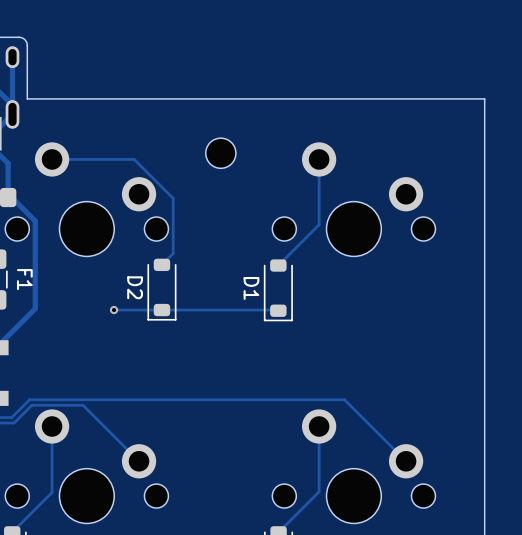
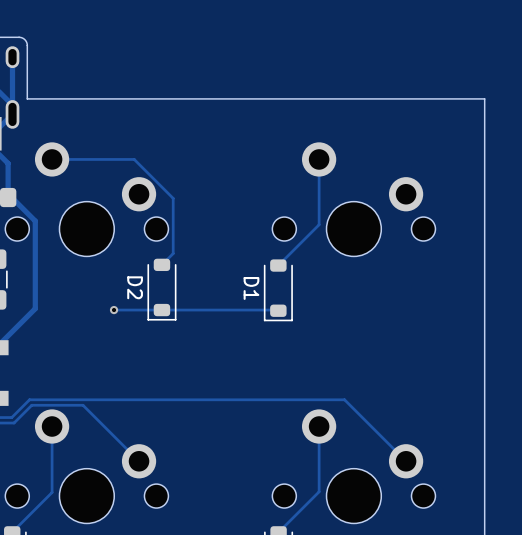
part: (220, 153) -> none
F1 name: F1 (24, 279) -> none

